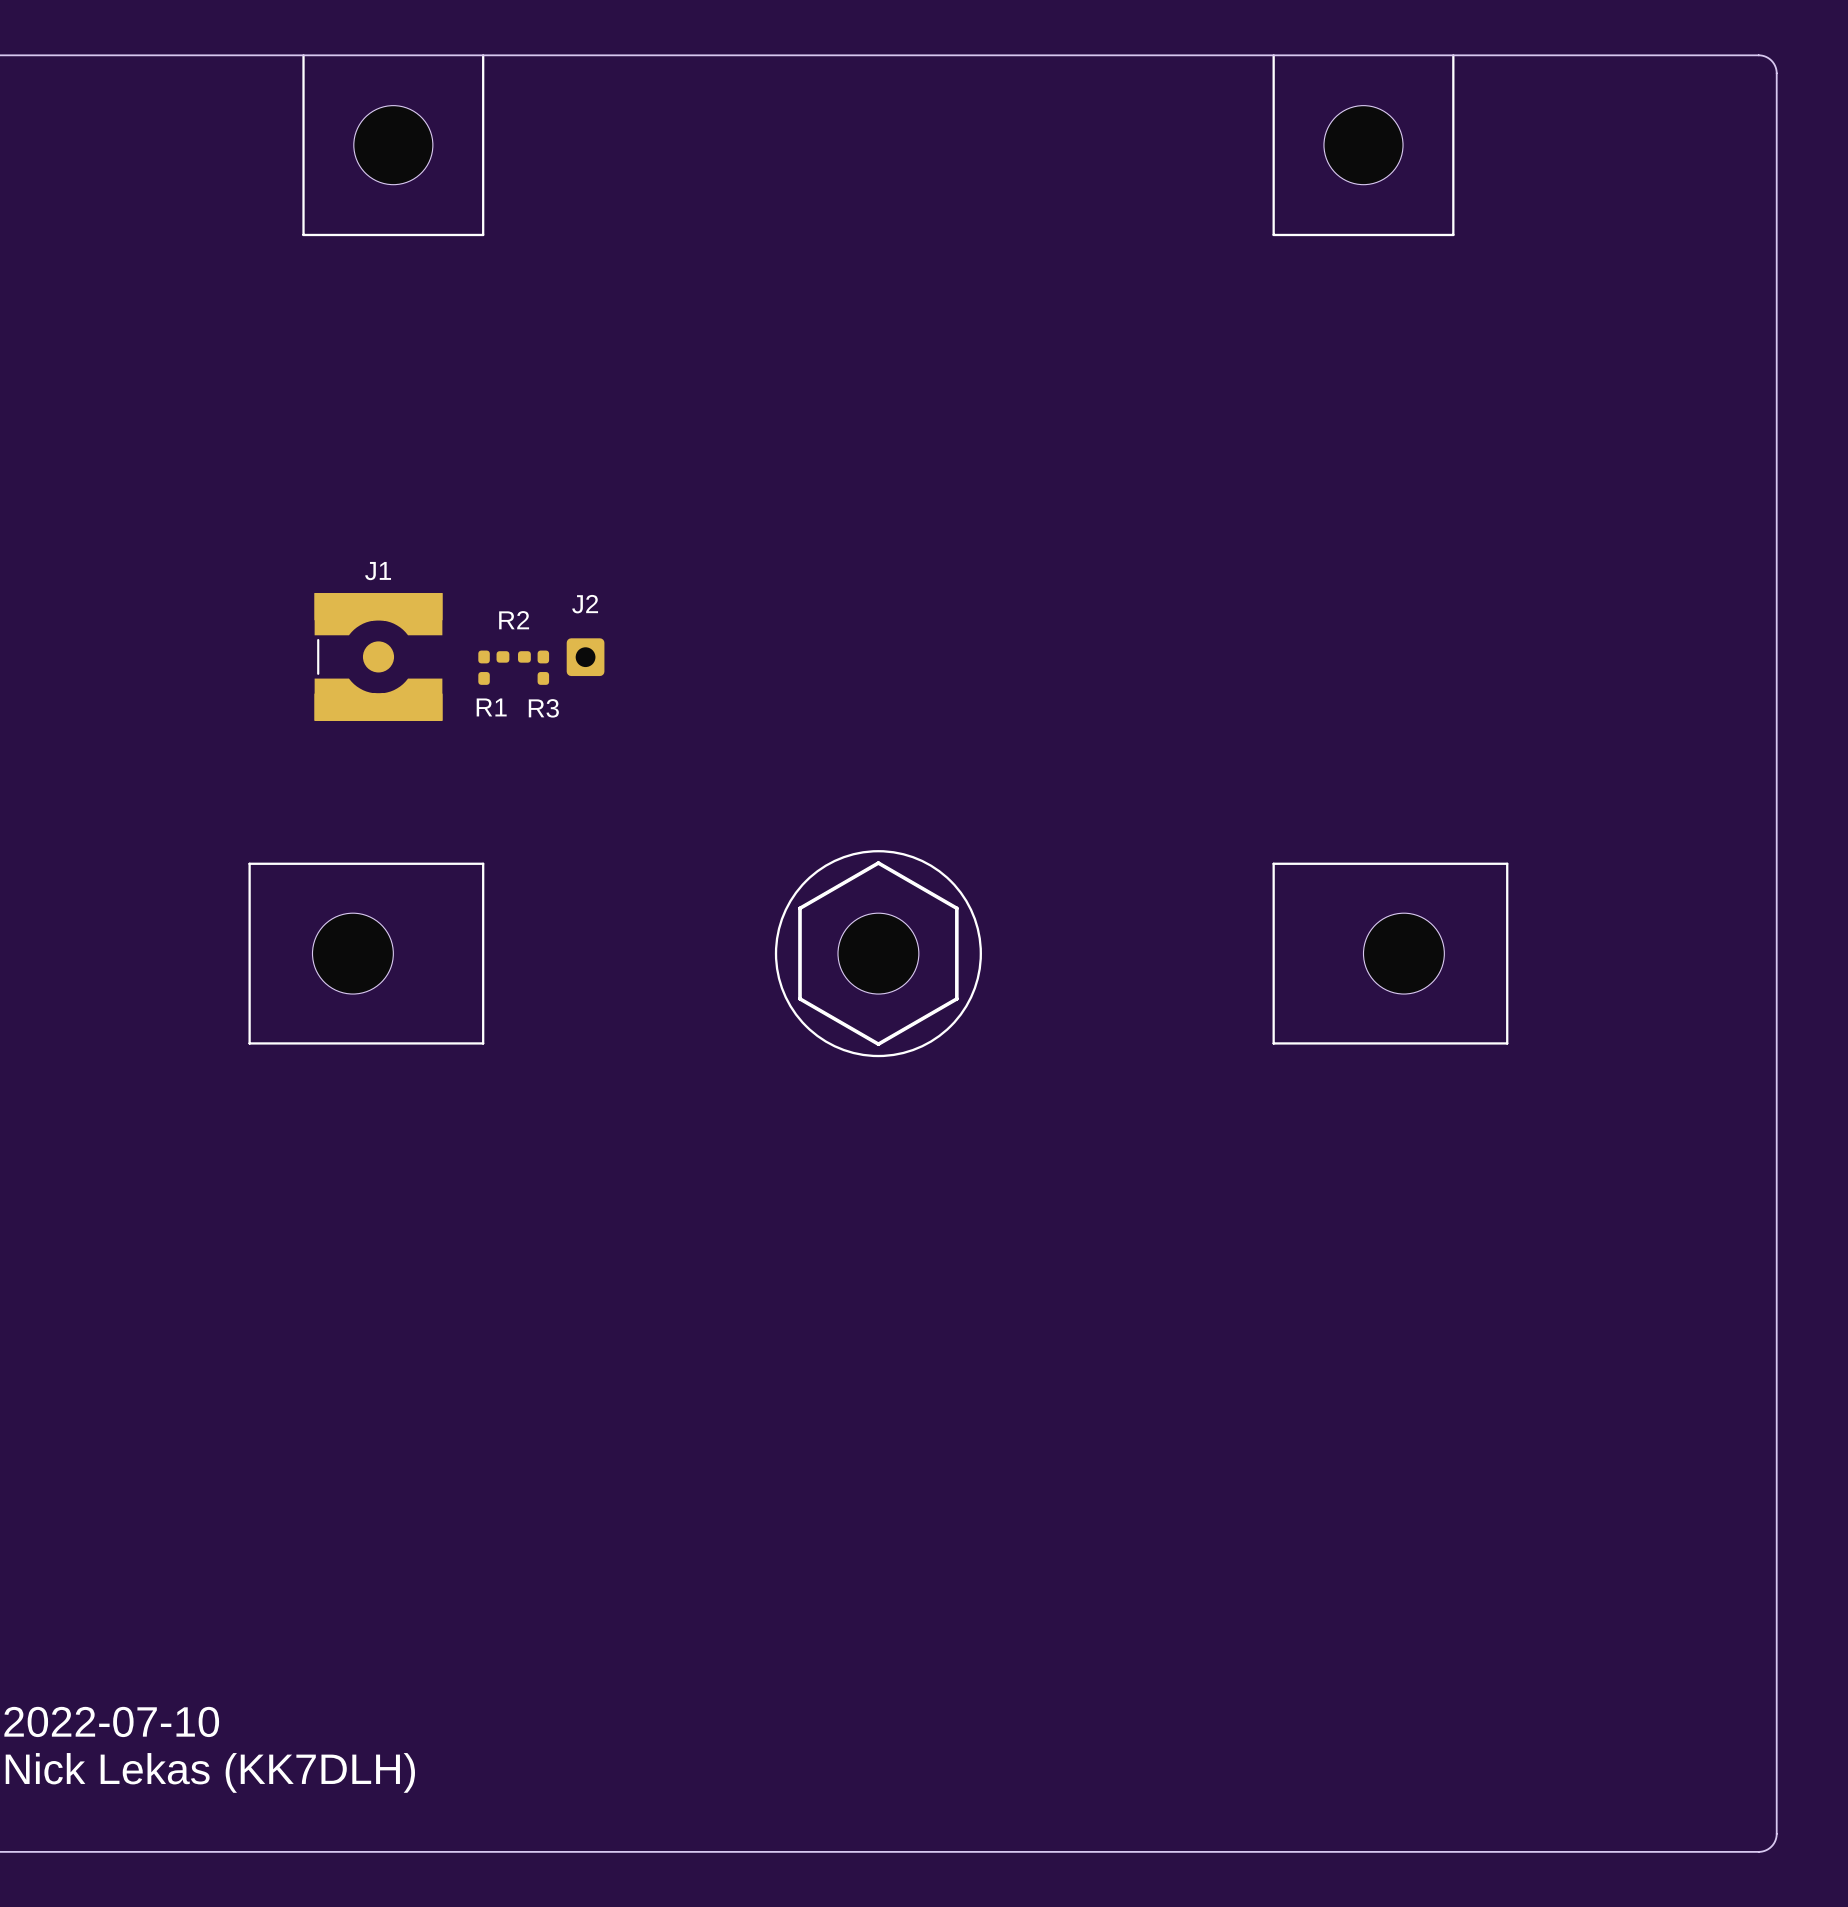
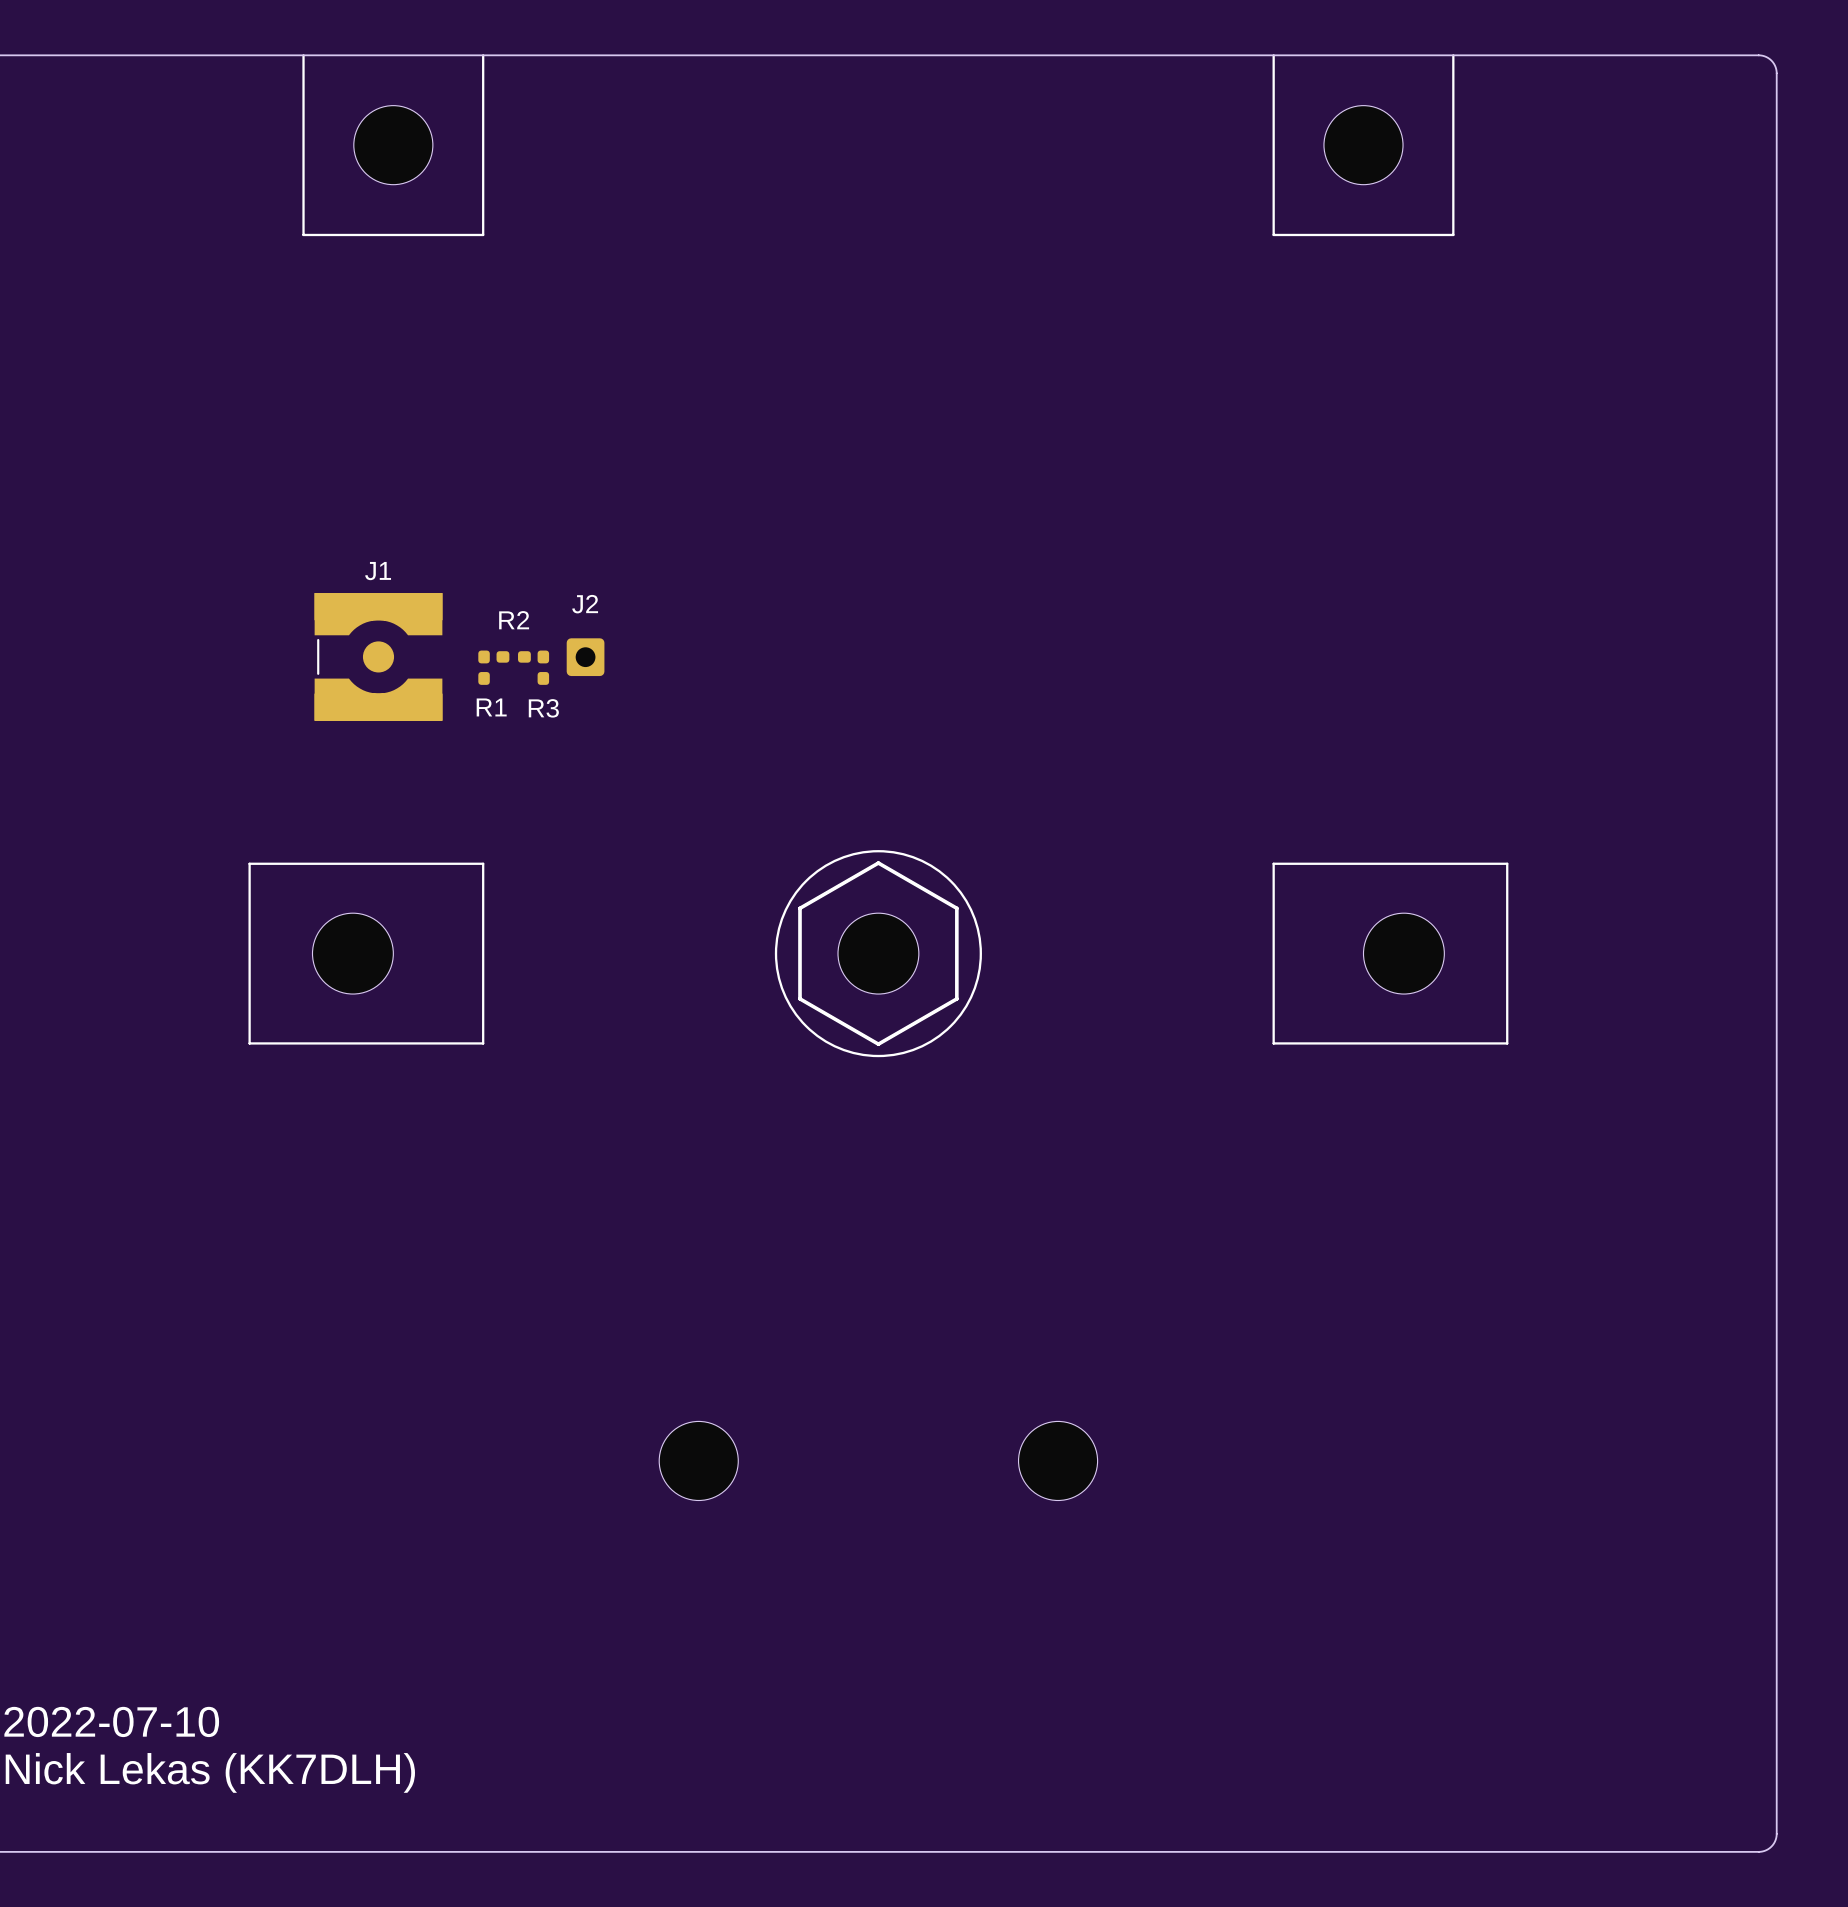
part: none -> (698, 1460)
part: none -> (1058, 1460)

